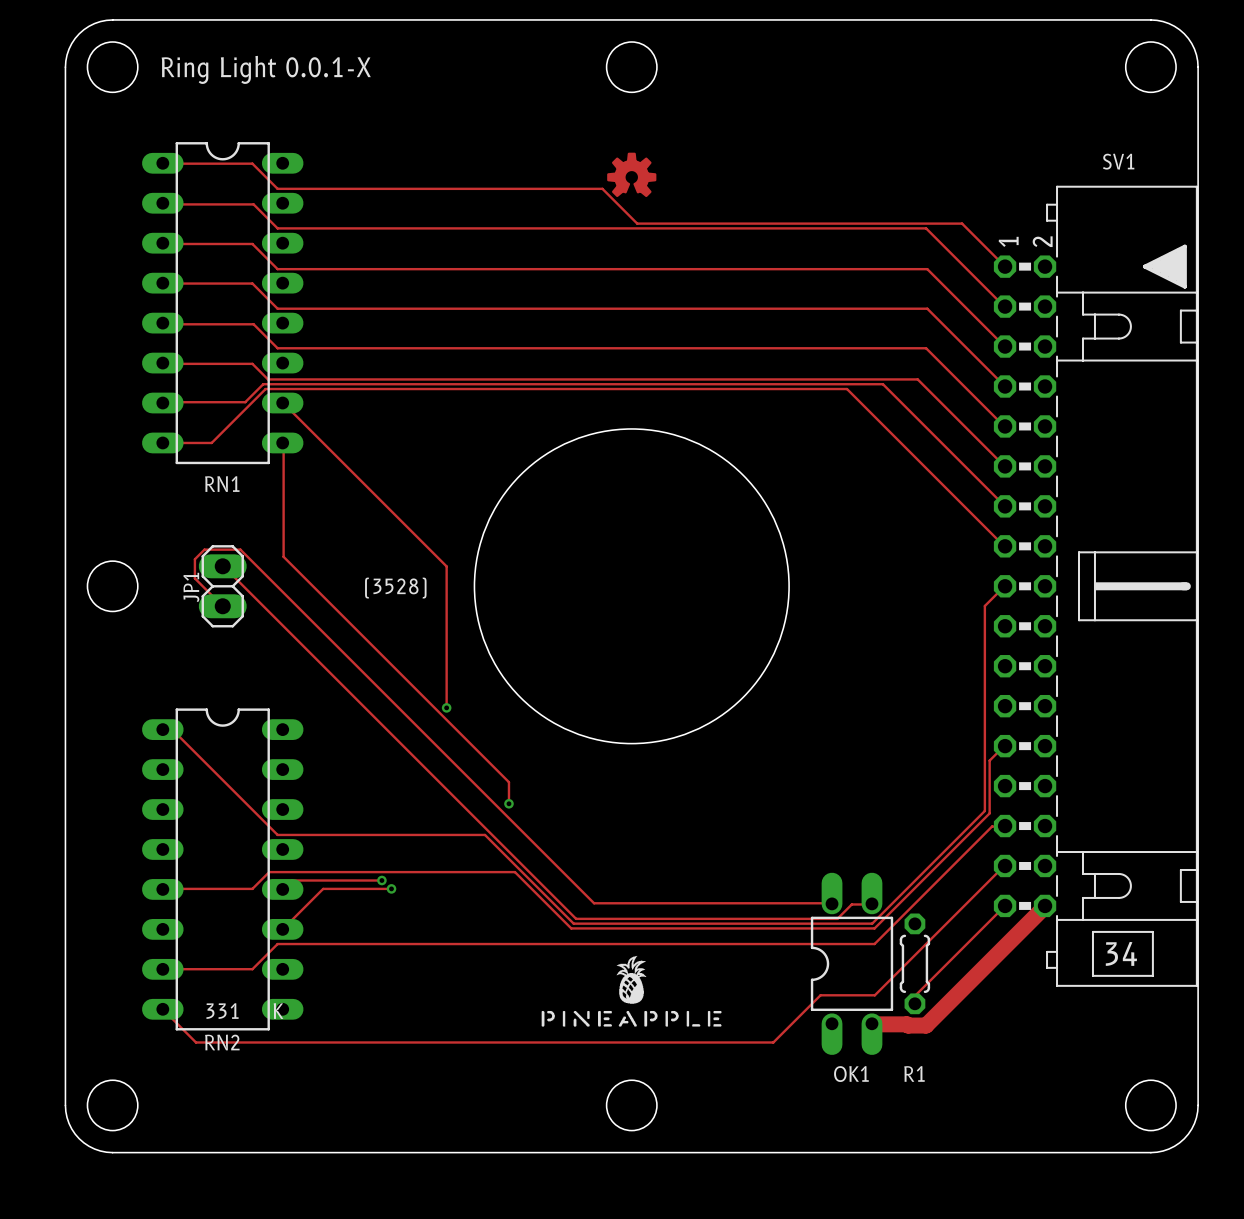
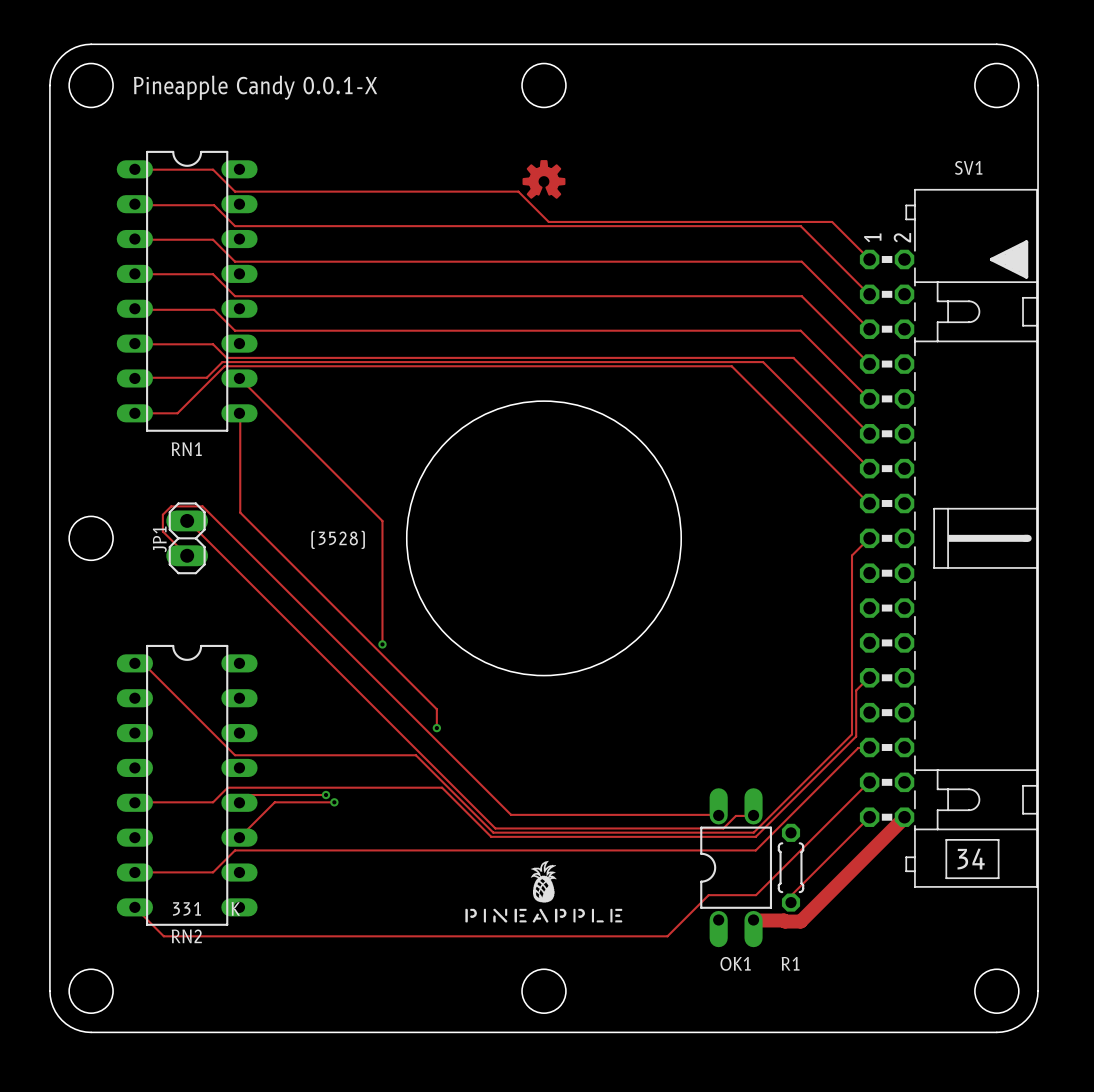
text: Ring Light 0.0.1-X (266, 69) -> Pineapple Candy 0.0.1-X (255, 87)

